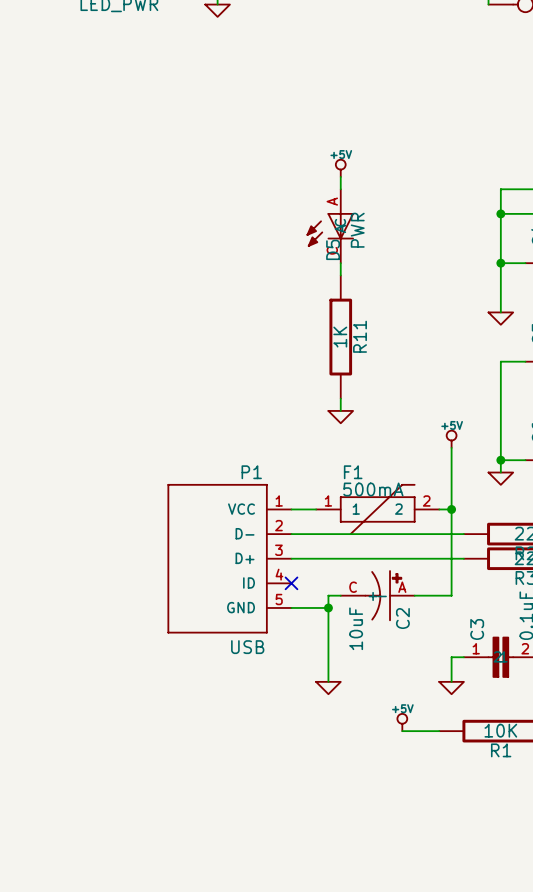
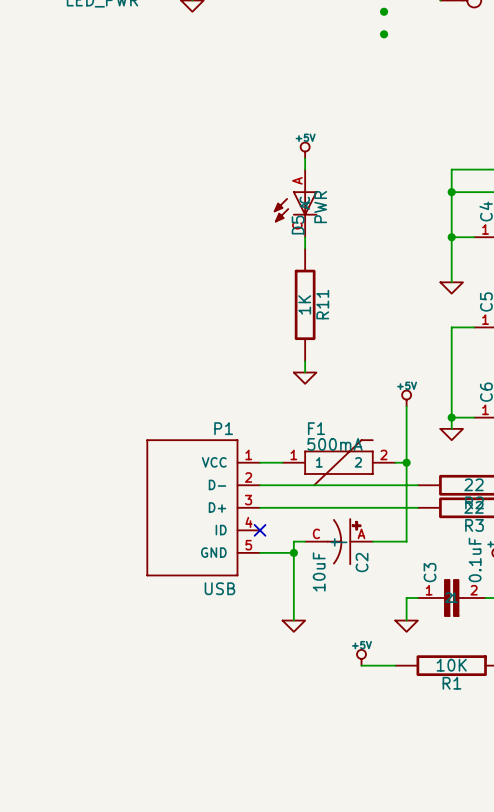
junction: none -> (384, 11)
junction: none -> (384, 34)

